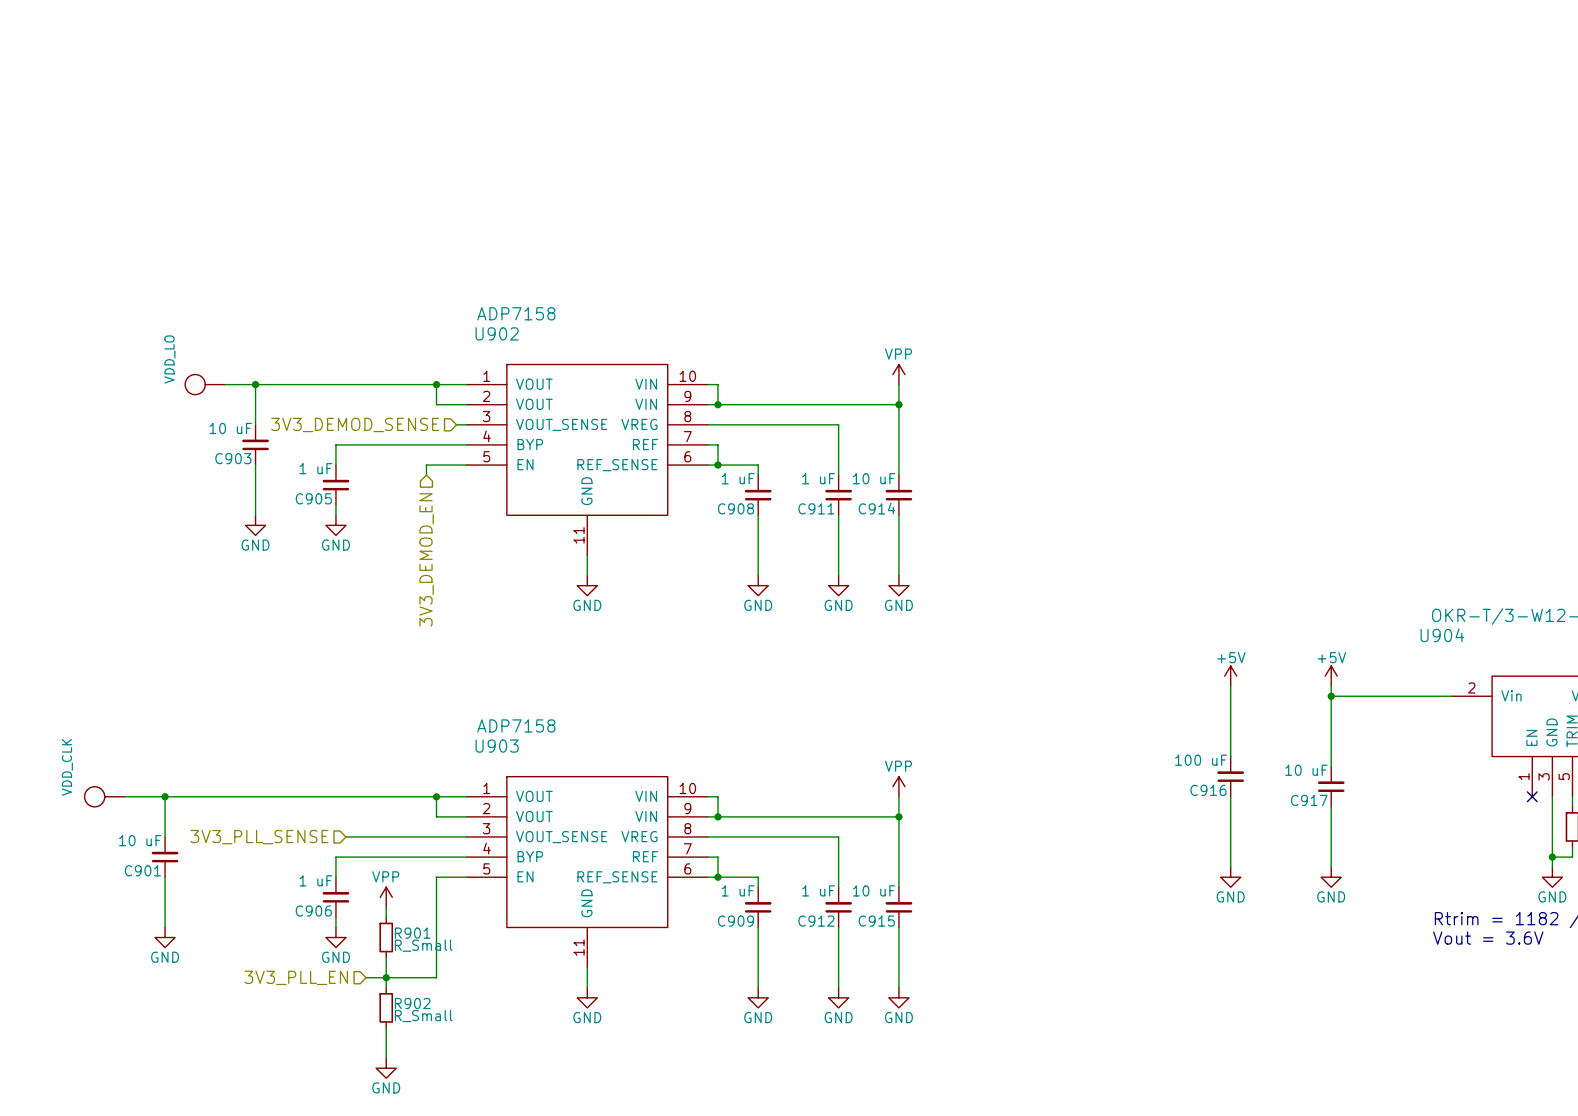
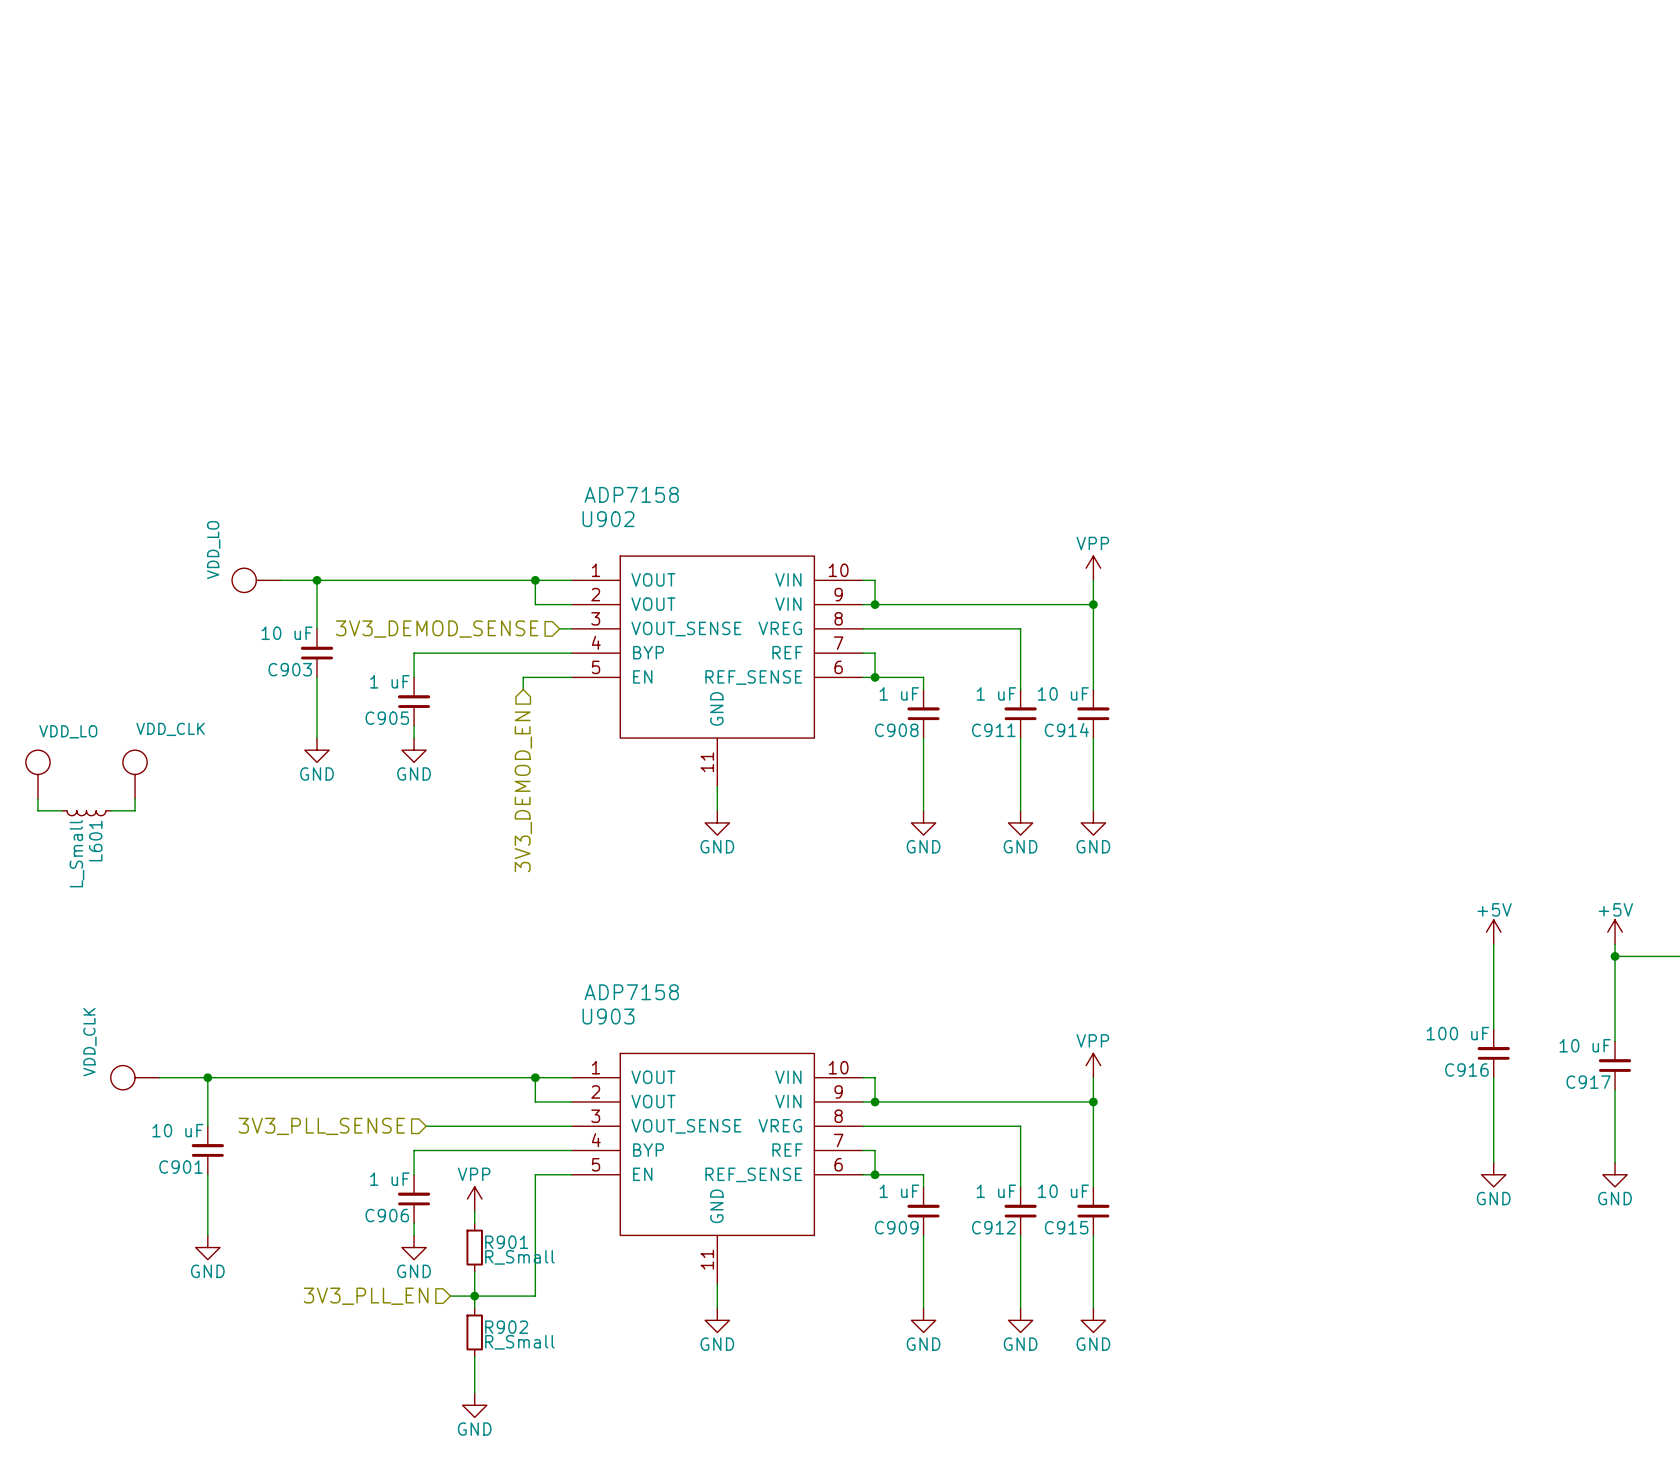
power symbol: none -> VDD_LO (37, 774)
power symbol: none -> VDD_CLK (135, 774)
wire: none -> (37, 798) (37, 810) (62, 810)
wire: none -> (135, 798) (135, 810) (110, 810)
L601: none -> L_Small (86, 813)

